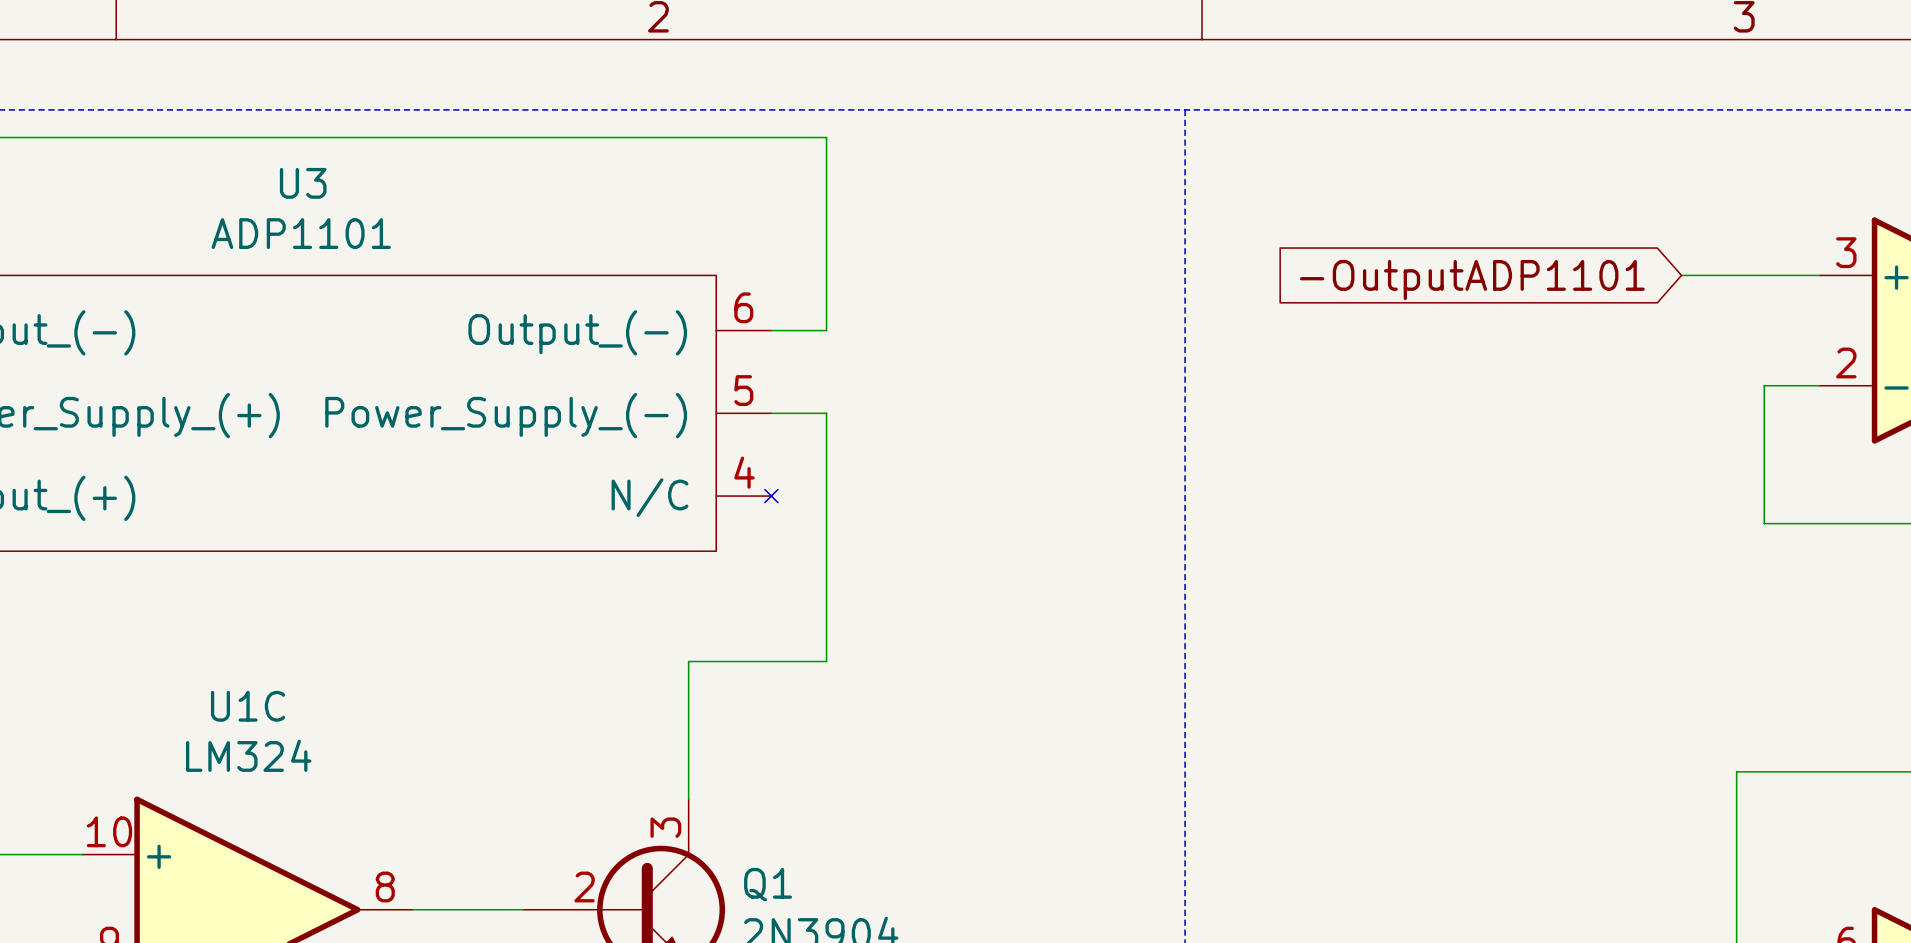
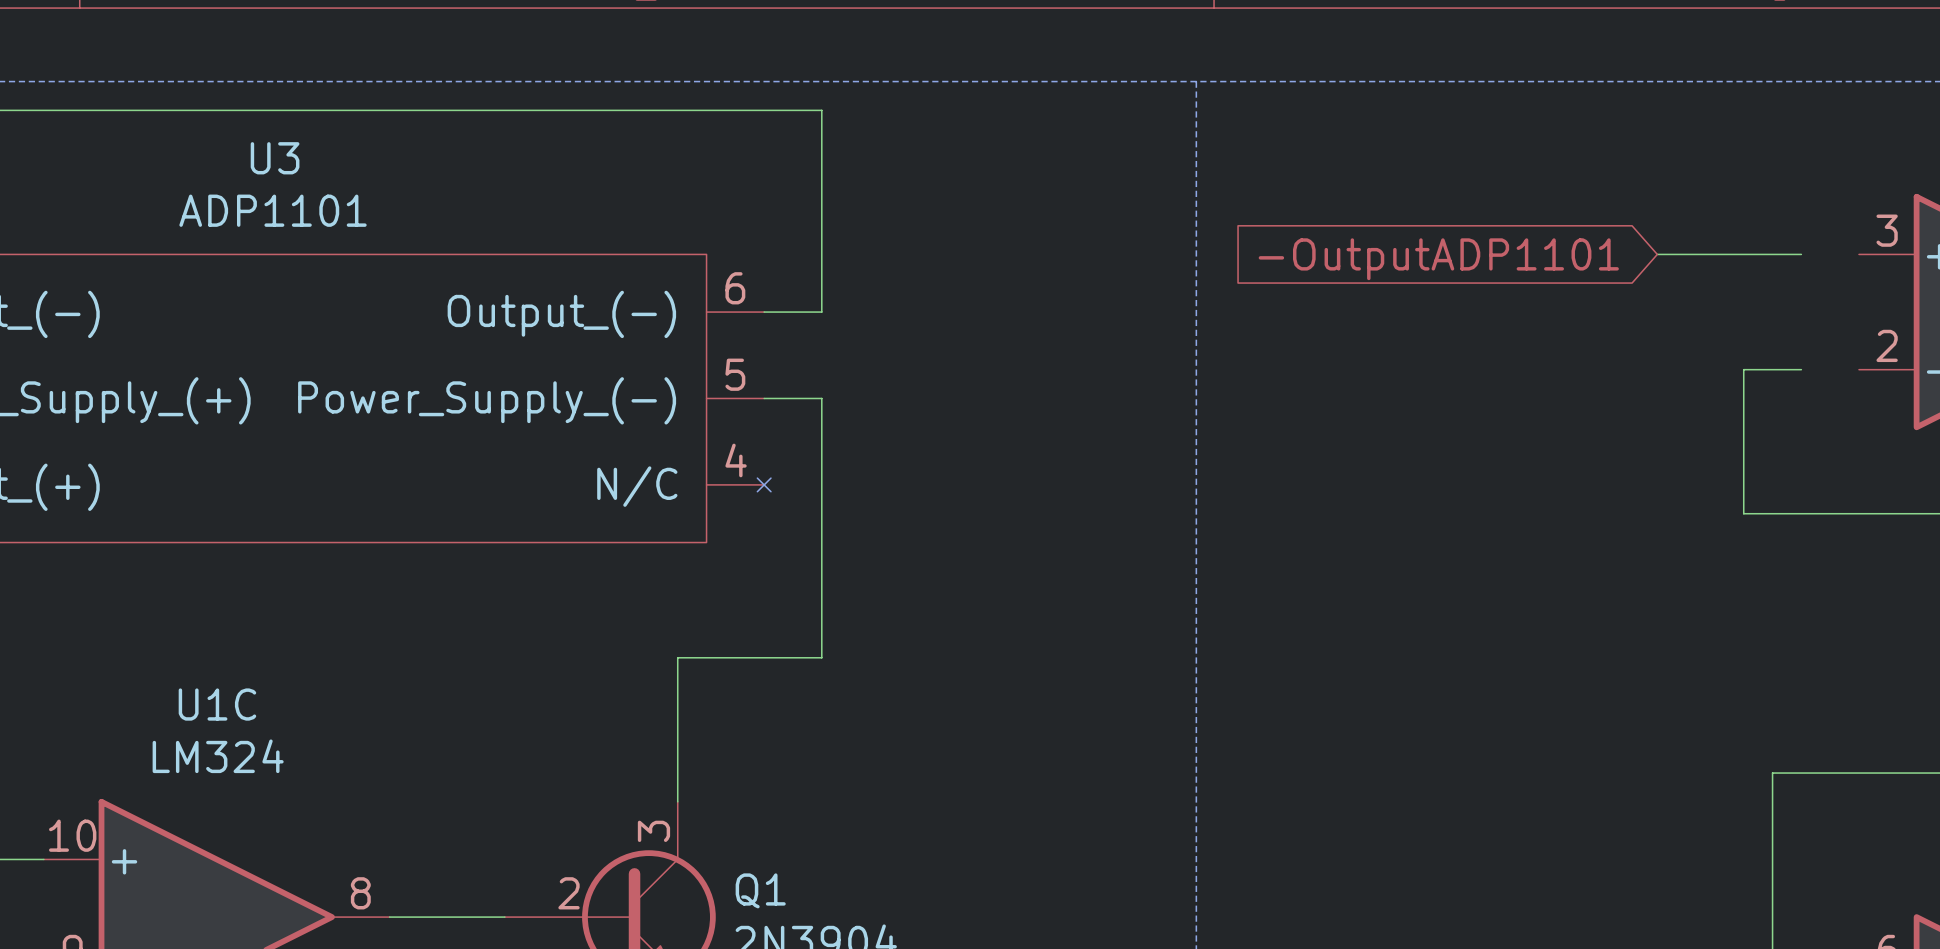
wire: (1764, 275) (1819, 275) -> (1657, 254) (1714, 254)
global label position: -OutputADP1101 (1472, 280) -> -OutputADP1101 (1438, 259)
wire: (1819, 385) (1764, 385) (1764, 523) -> (1801, 369) (1743, 369) (1743, 513) (1801, 513)

